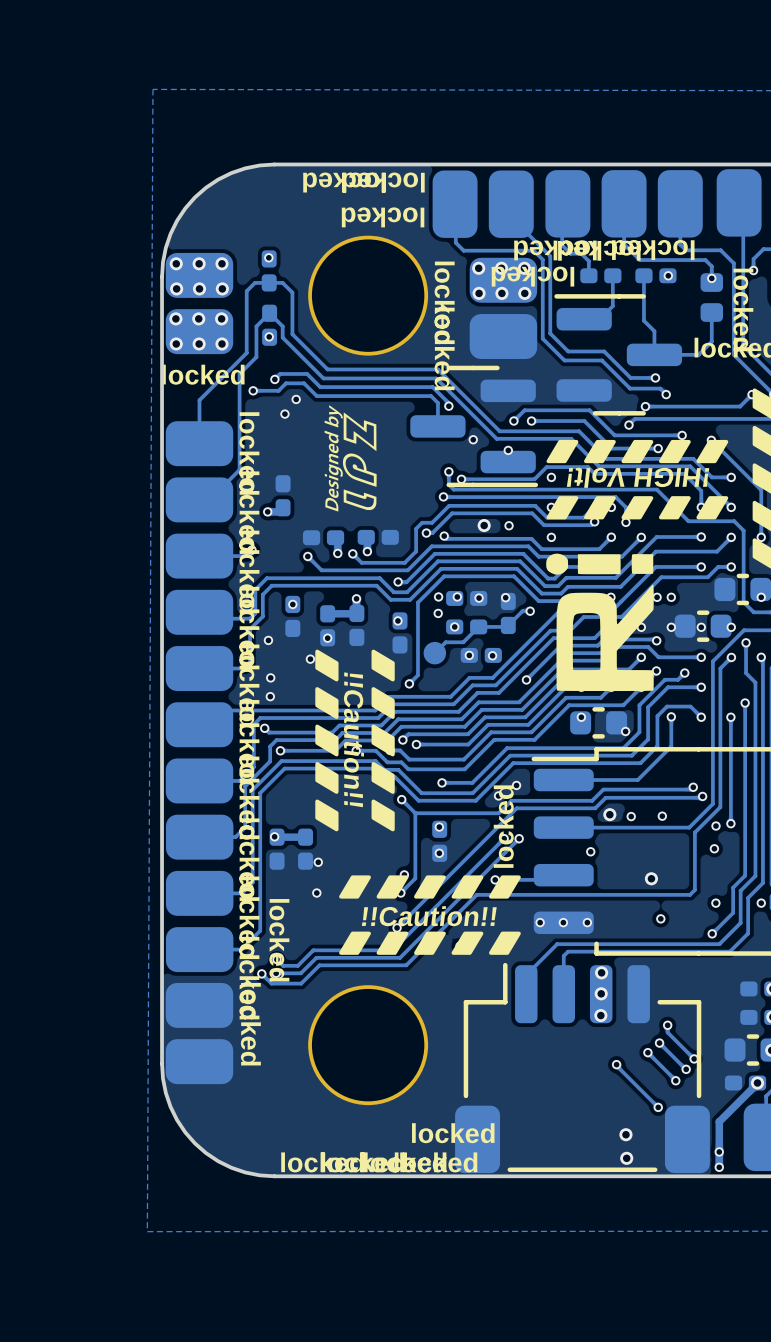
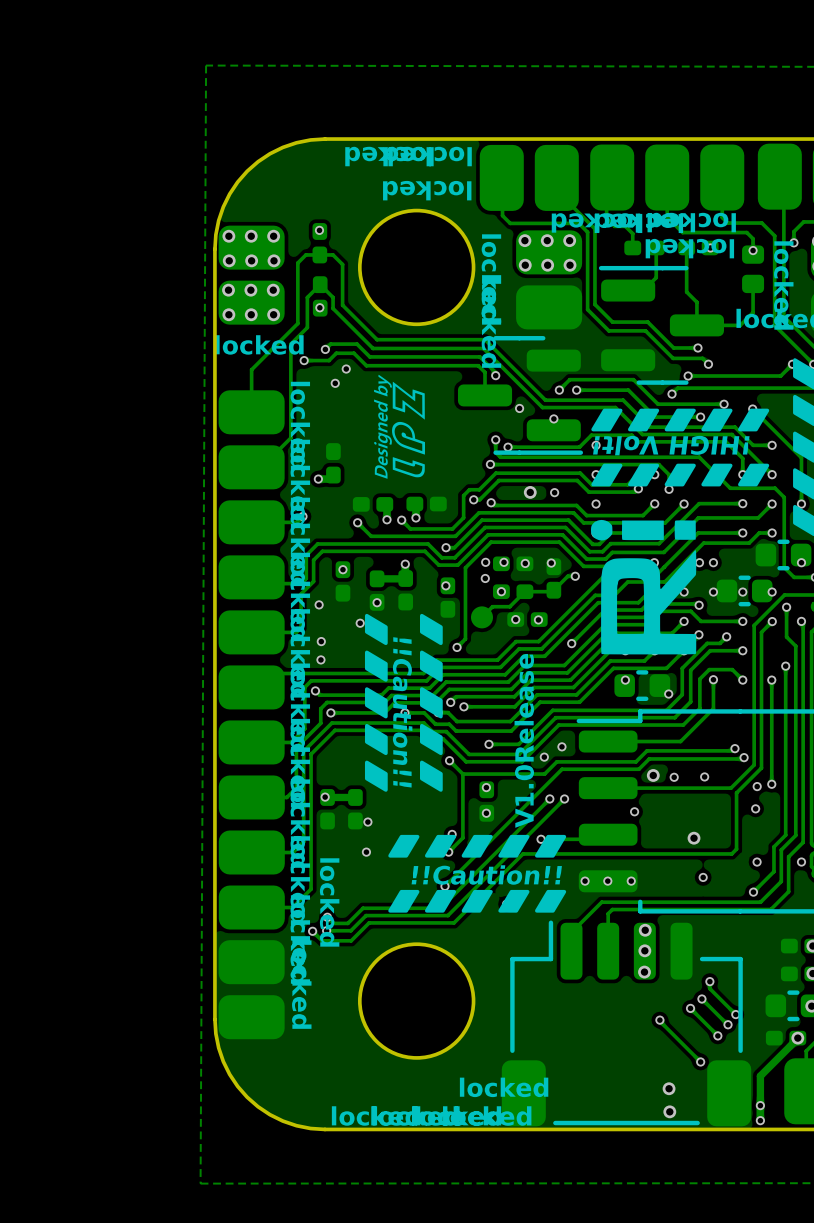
text position: locked (532, 276) -> locked (689, 248)
text: locked (503, 826) -> V1.0Release (524, 740)

